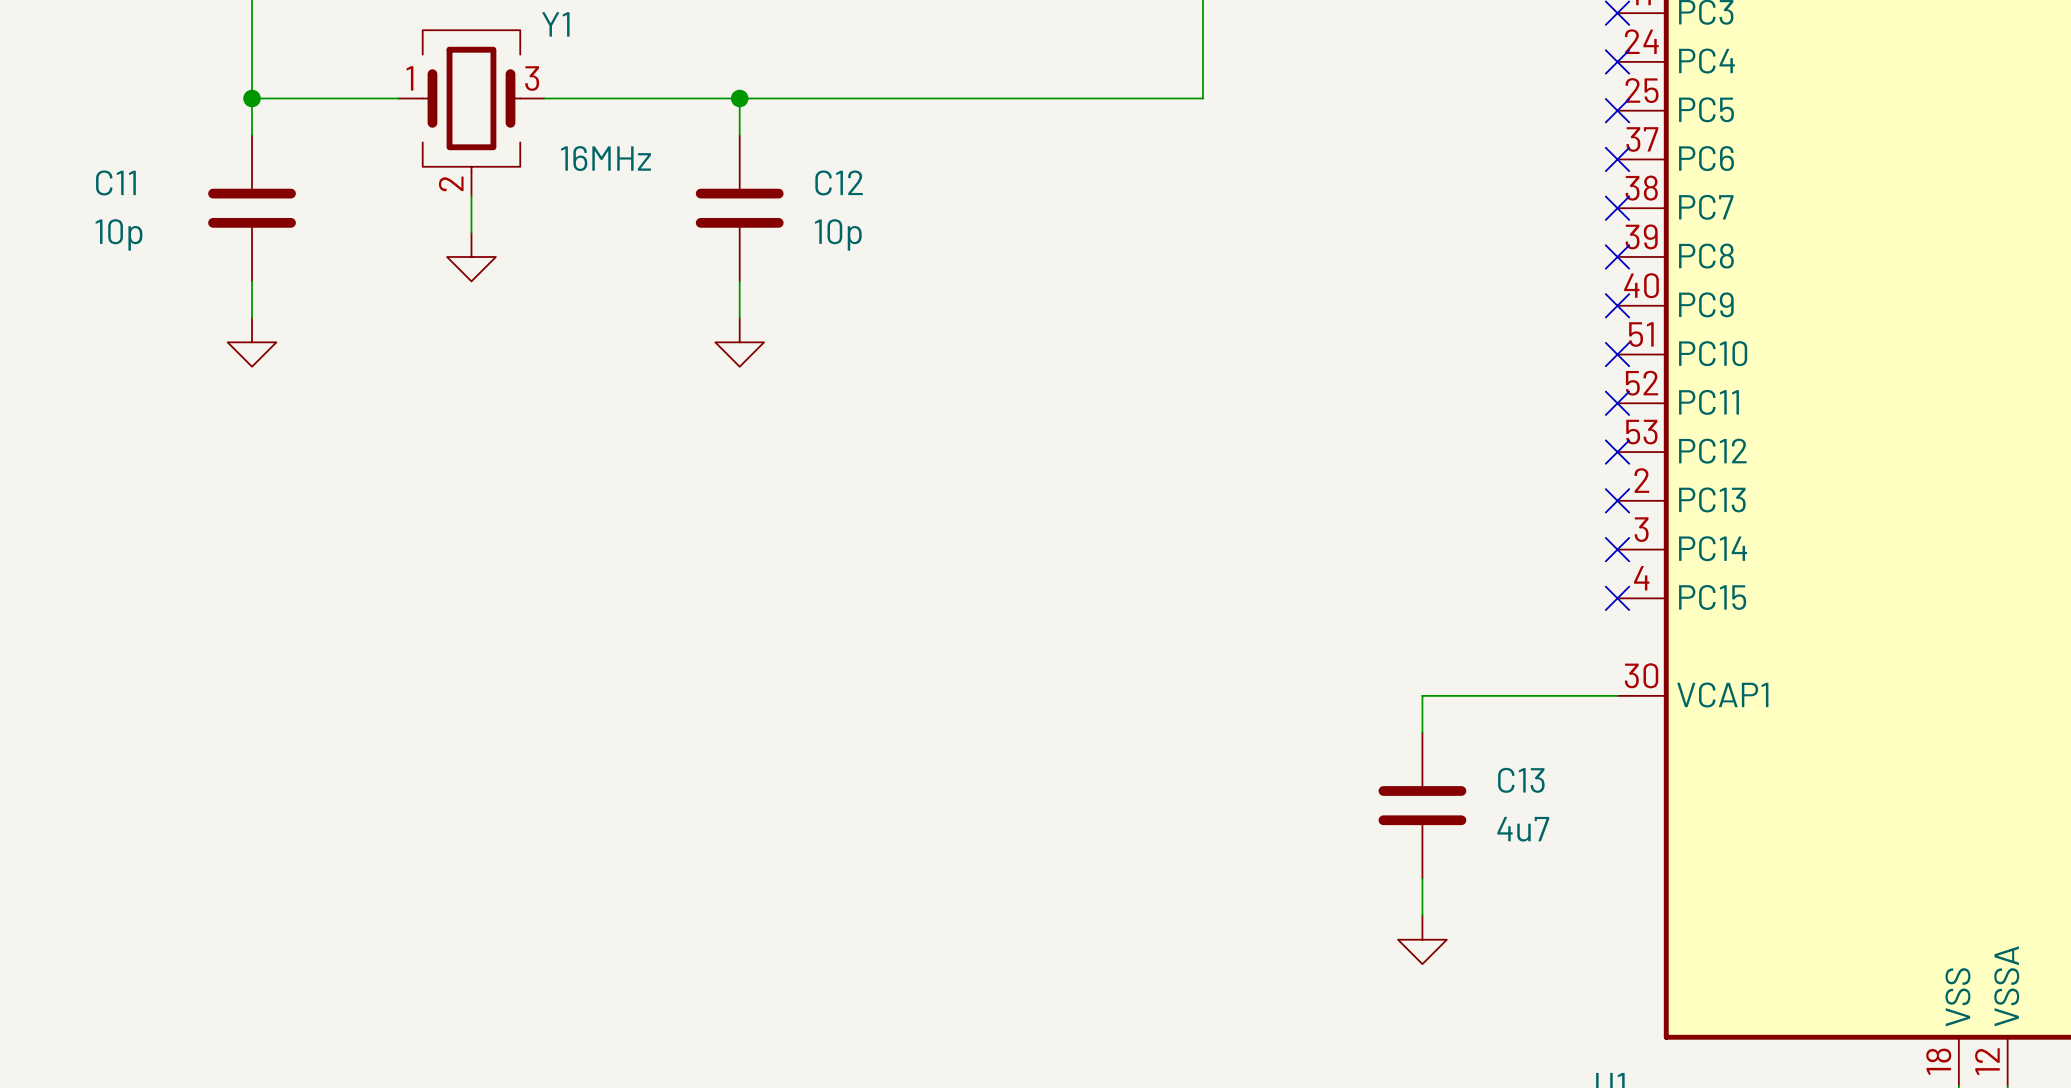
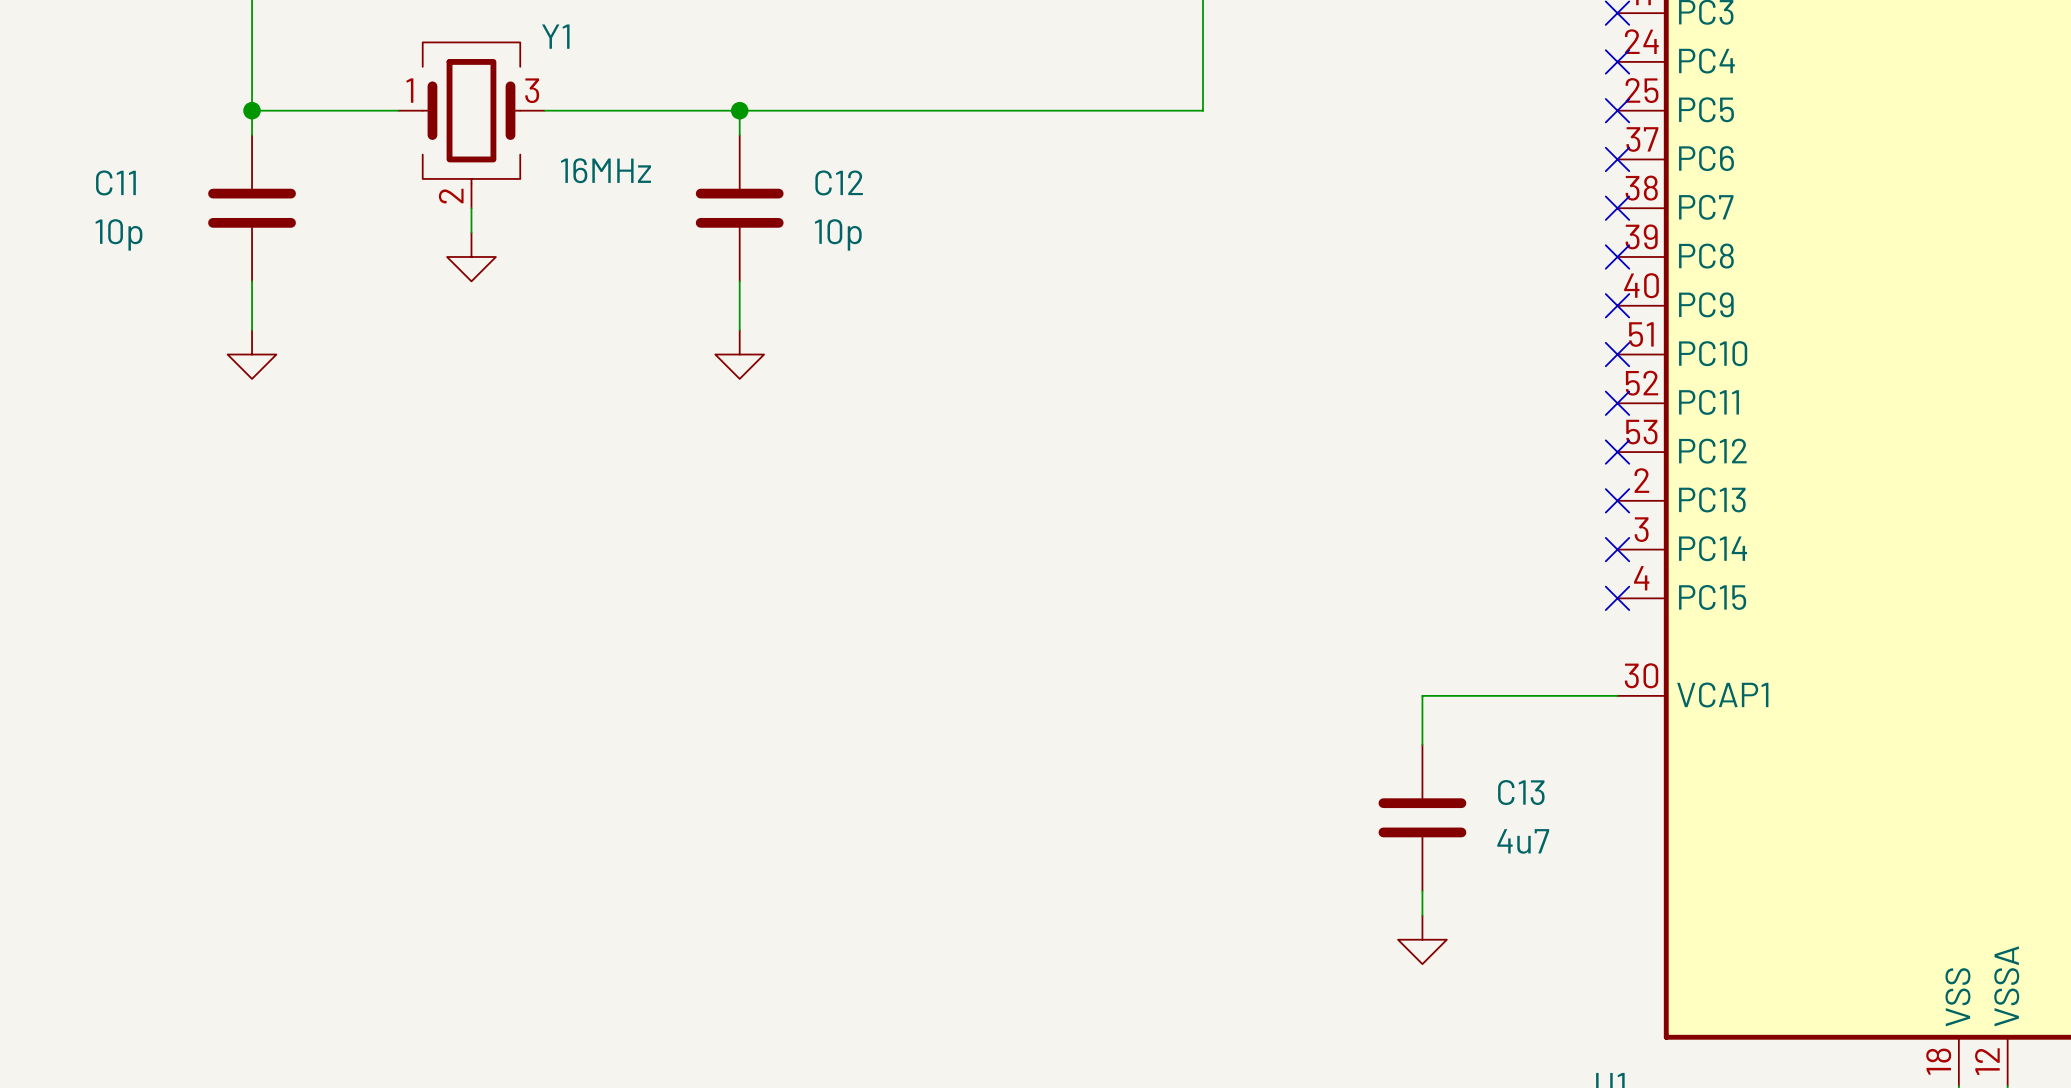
wire: (252, 98) (398, 98) -> (252, 110) (398, 110)
junction position: (252, 98) -> (252, 110)
wire: (544, 98) (1202, 98) -> (544, 110) (1202, 110) (1202, 98)
junction position: (739, 98) -> (739, 110)
Y1 position: (471, 113) -> (471, 125)
power symbol position: (252, 342) -> (252, 354)
power symbol position: (739, 342) -> (739, 354)
C13 position: (1422, 805) -> (1422, 817)

